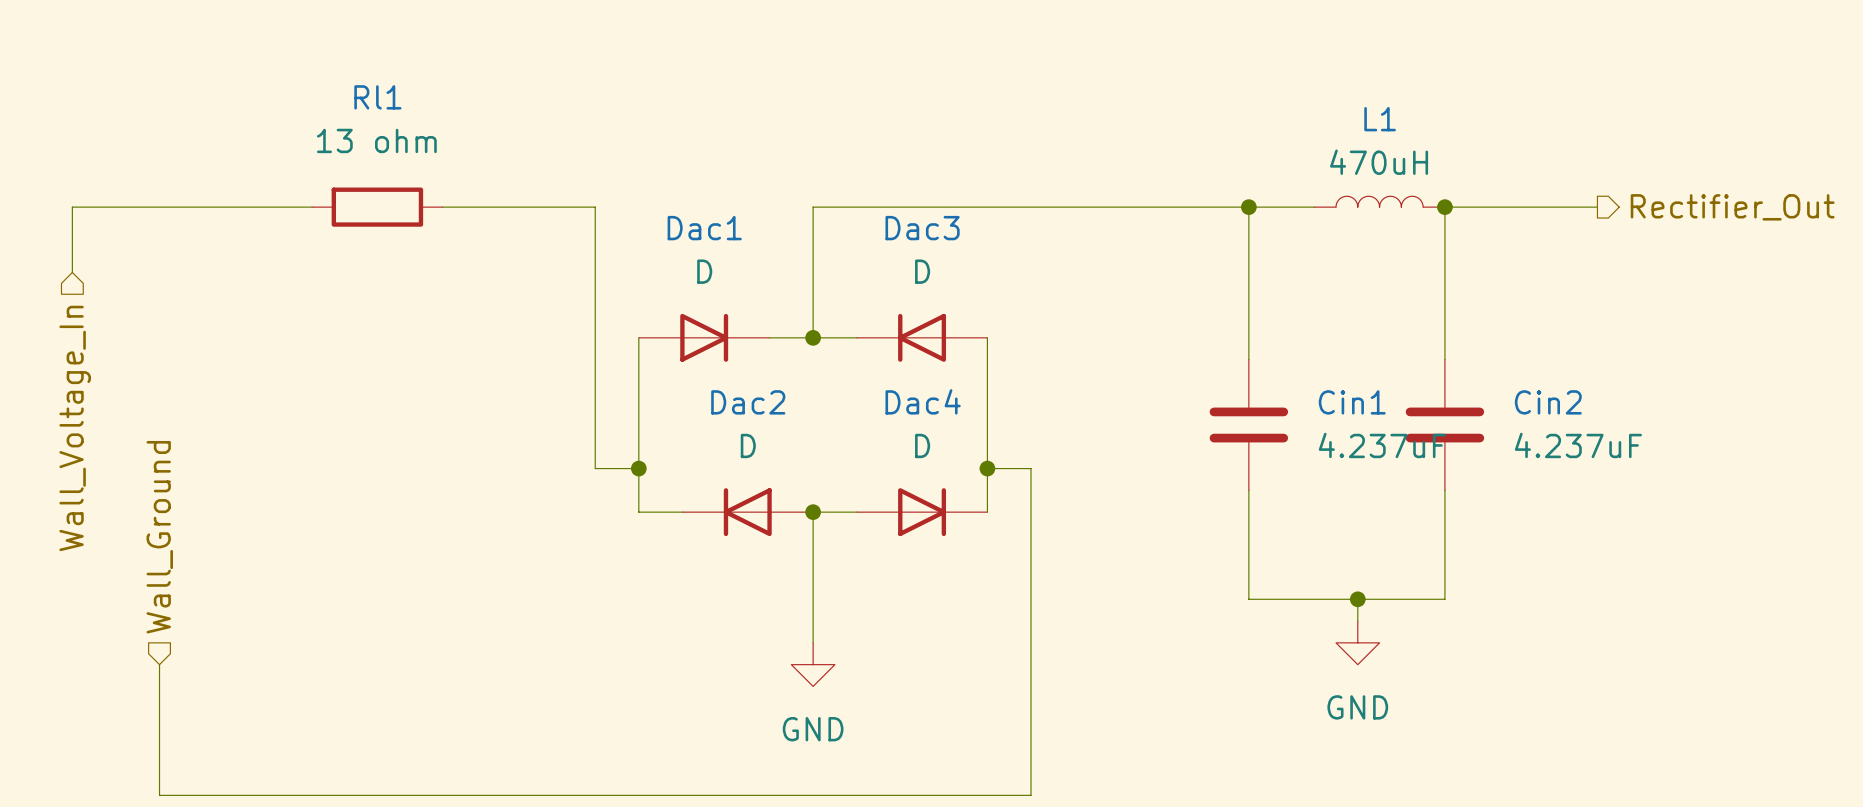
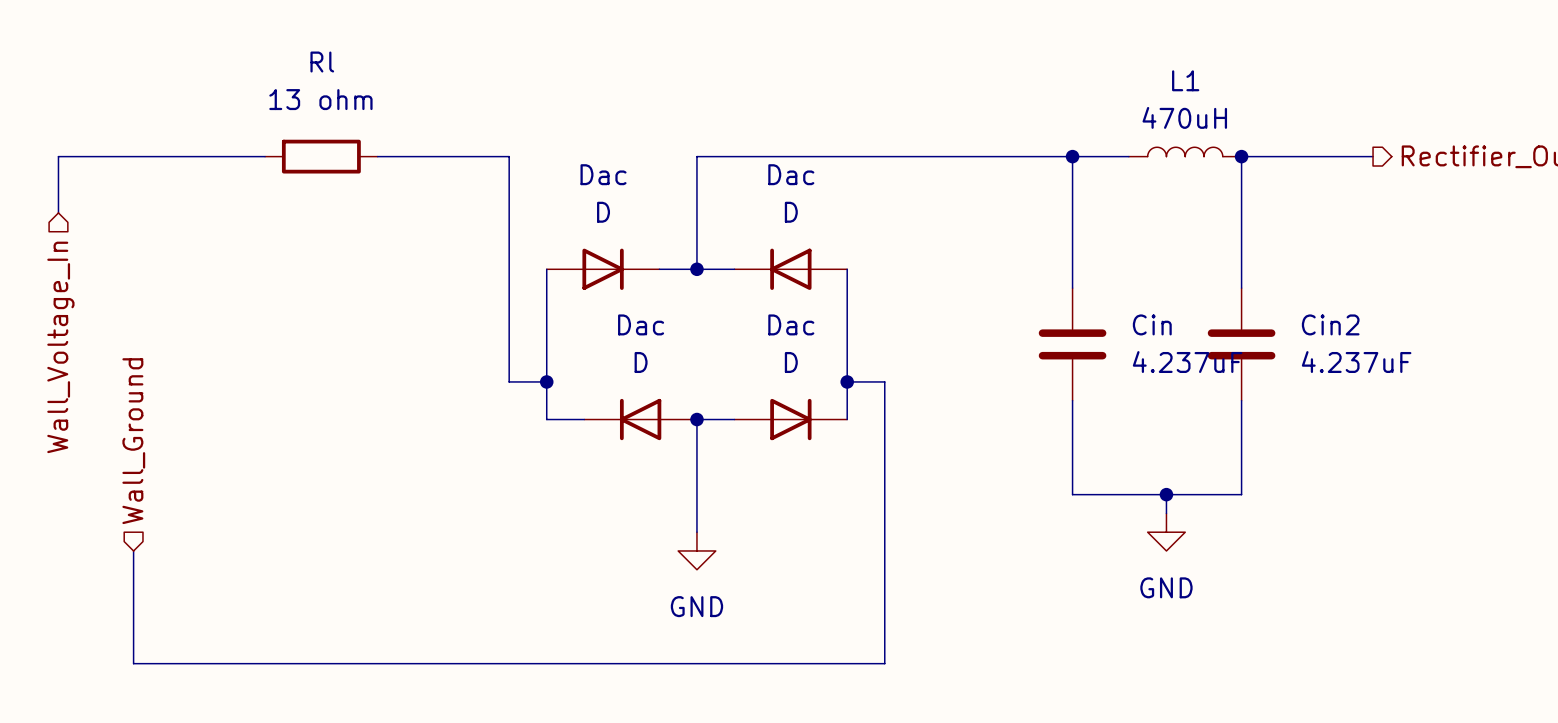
Rl1 name: Rl1 (377, 97) -> Rl (322, 62)
Dac1 name: Dac1 (704, 228) -> Dac (603, 174)
Dac3 name: Dac3 (922, 228) -> Dac (791, 174)
Dac4 name: Dac4 (923, 401) -> Dac (791, 324)
Dac2 name: Dac2 (748, 402) -> Dac (641, 324)
Cin1 name: Cin1 (1352, 402) -> Cin (1152, 324)

